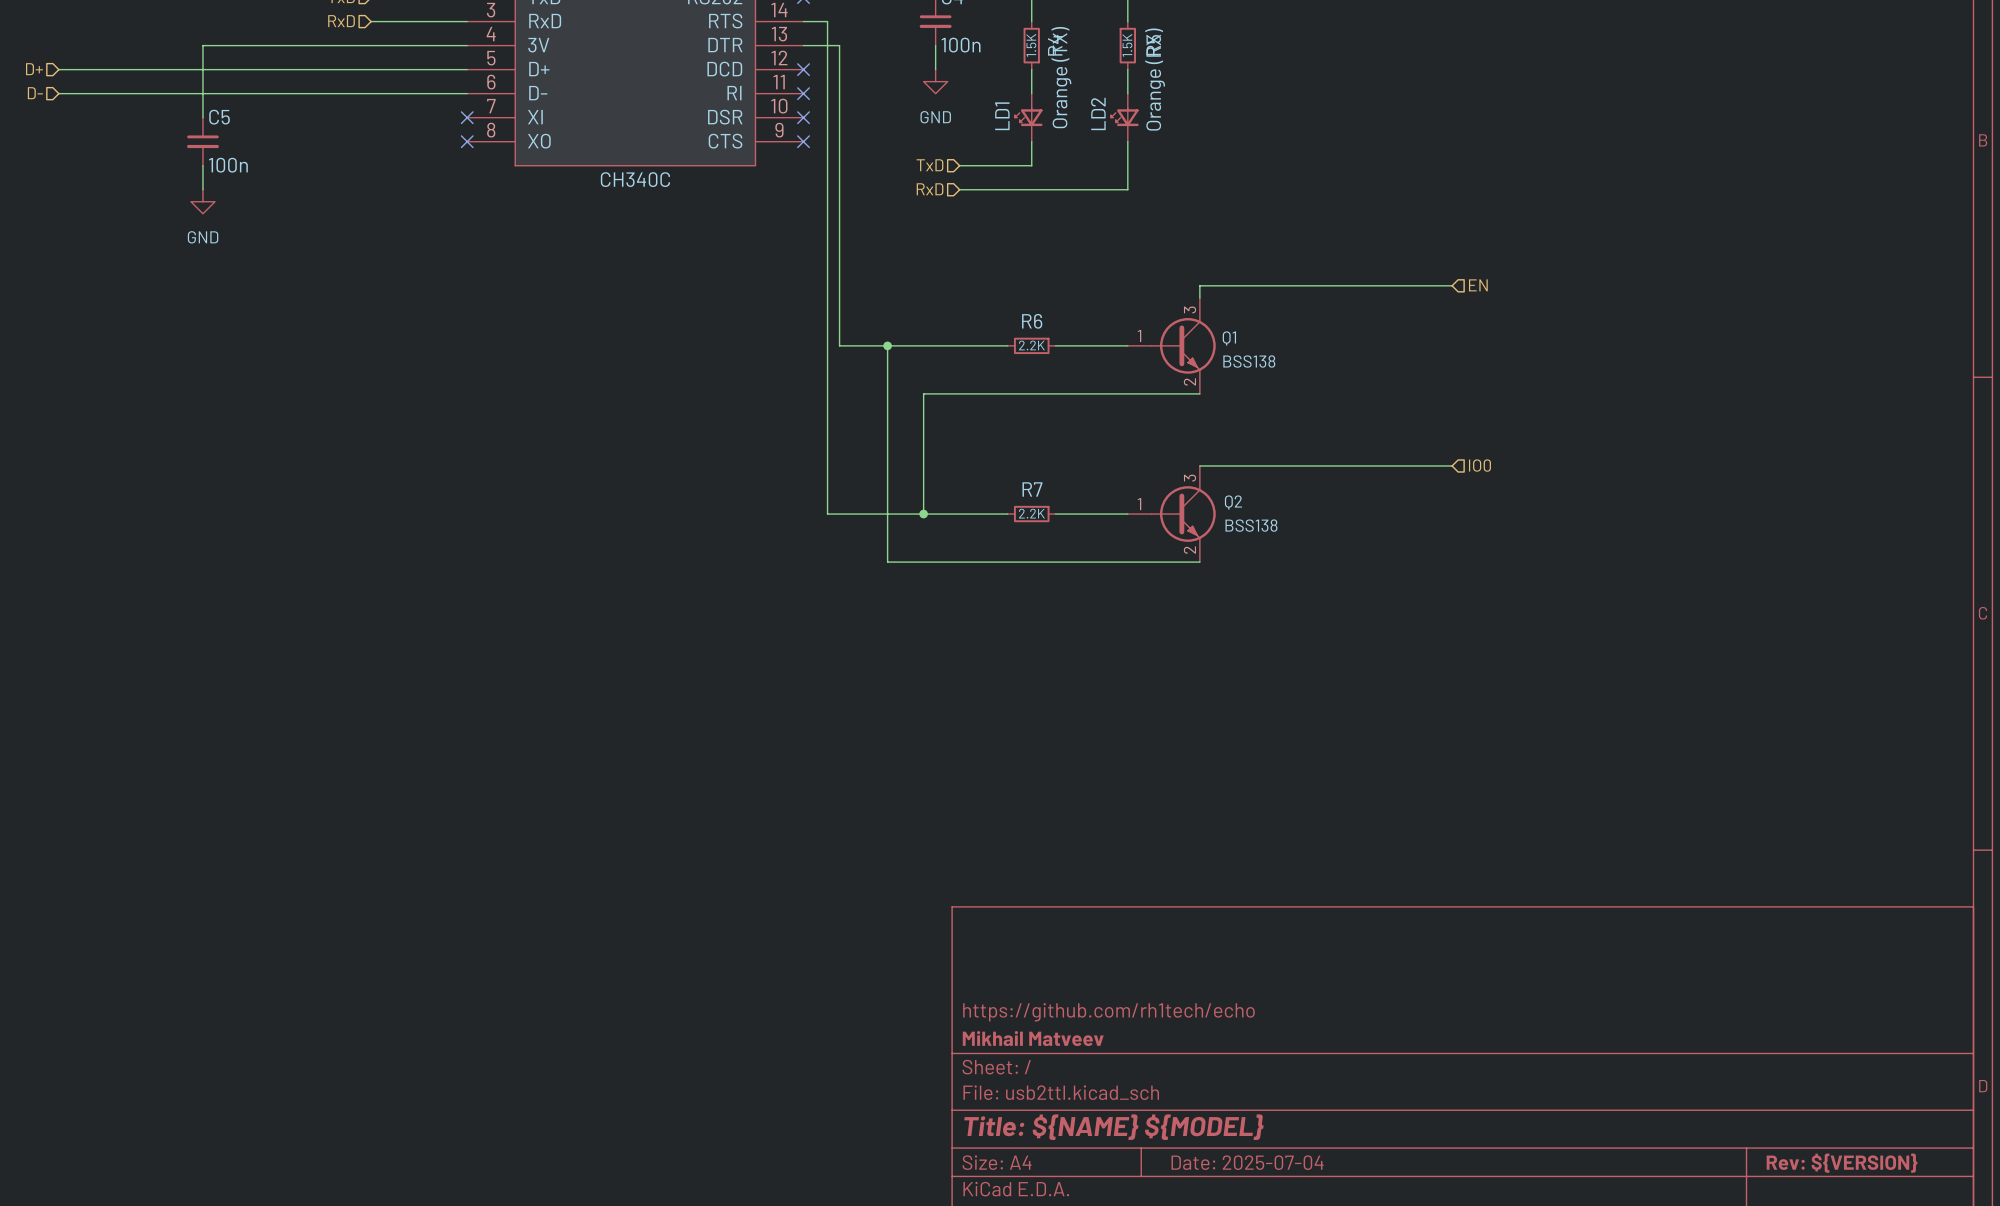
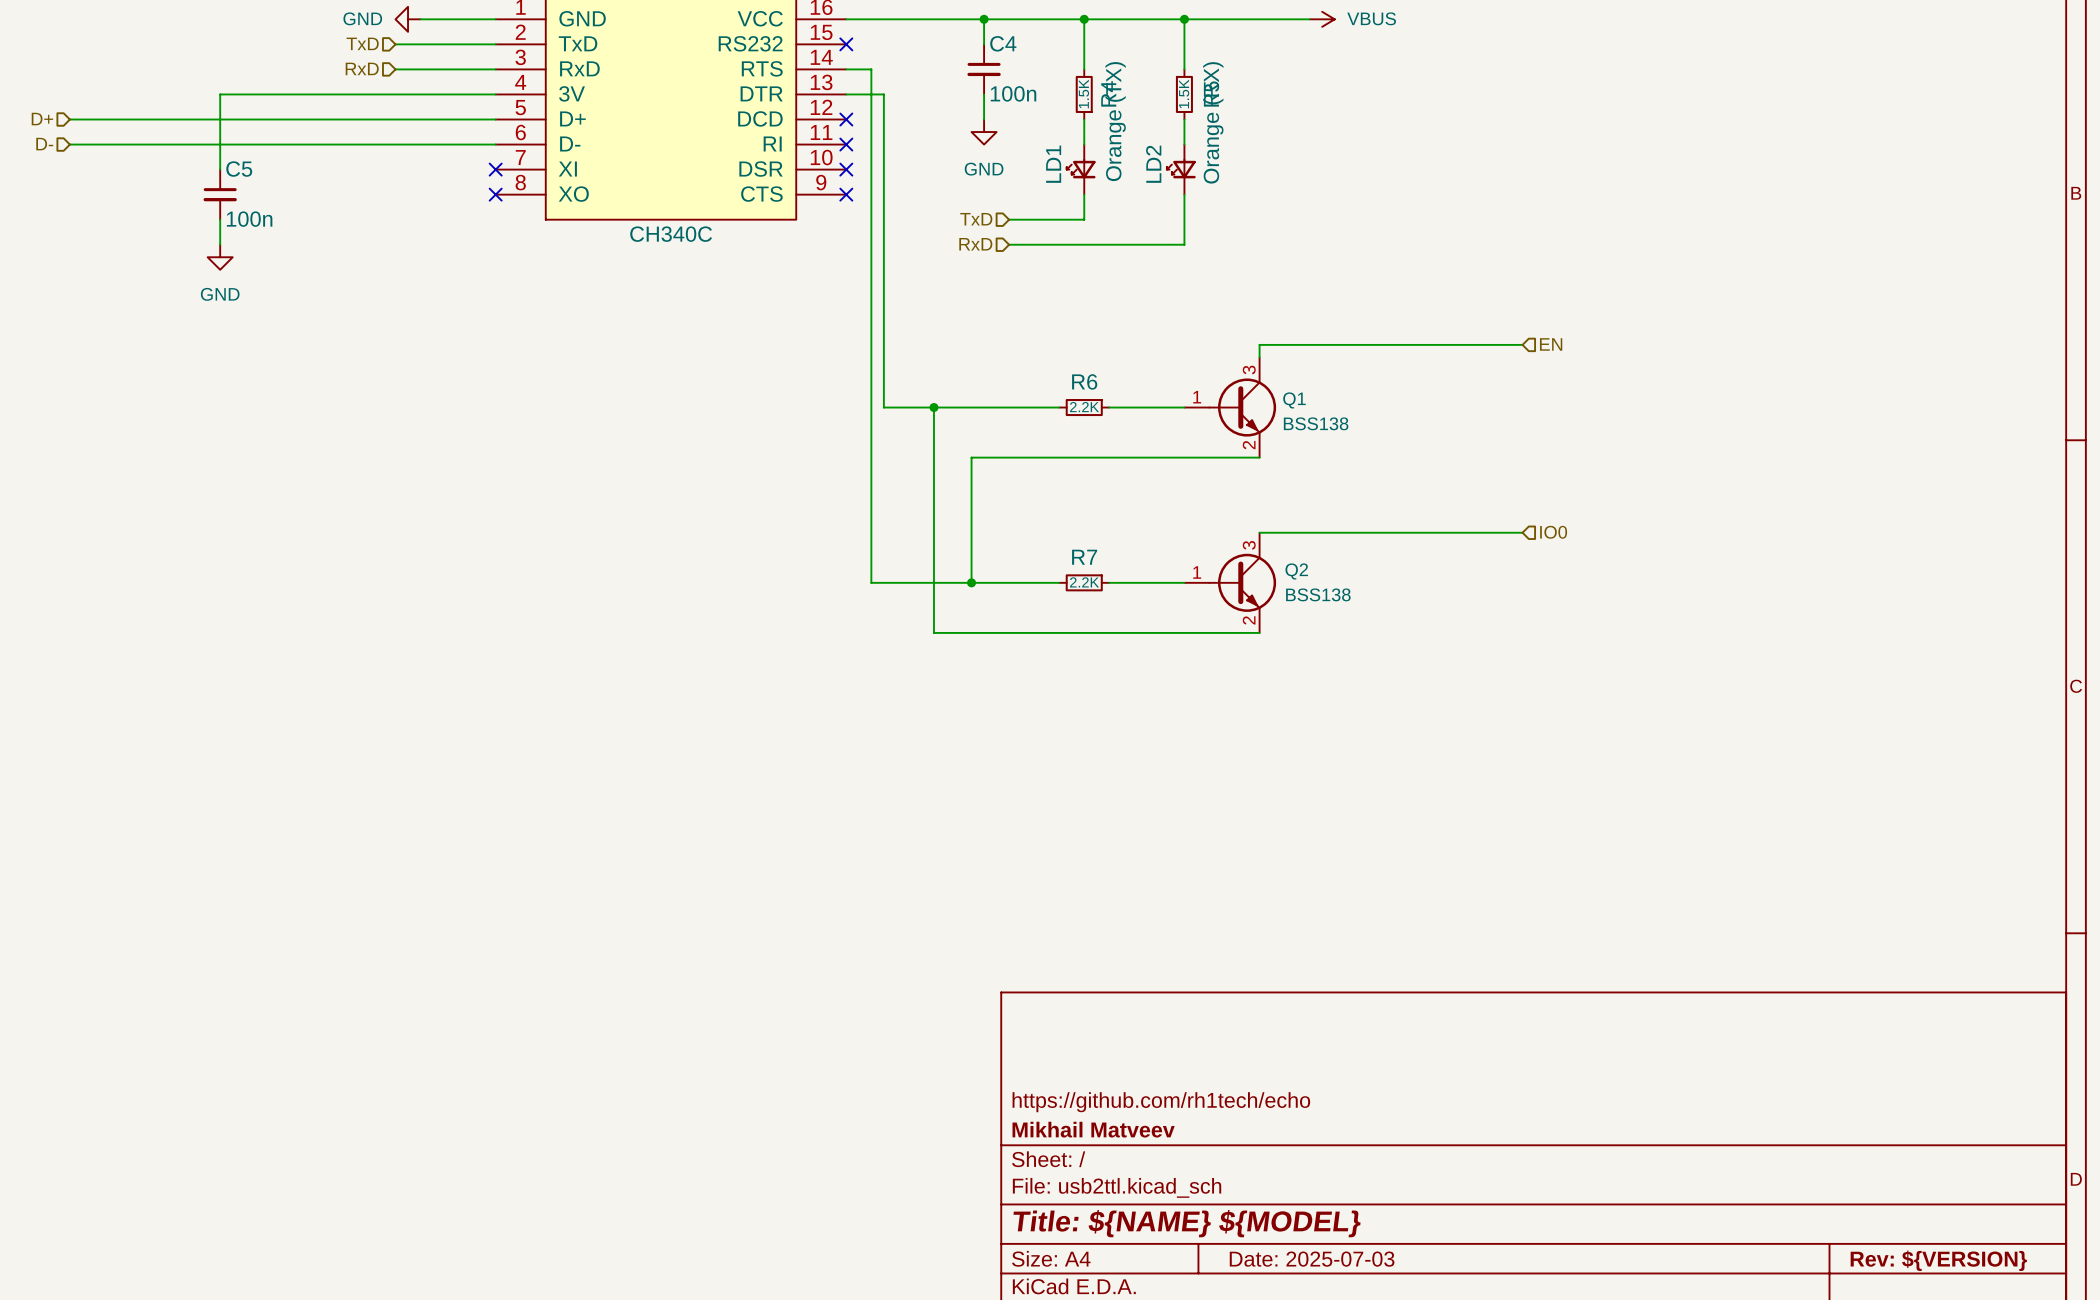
title block: Date: 2025-07-04 (1247, 1162) -> Date: 2025-07-03 (1312, 1259)

